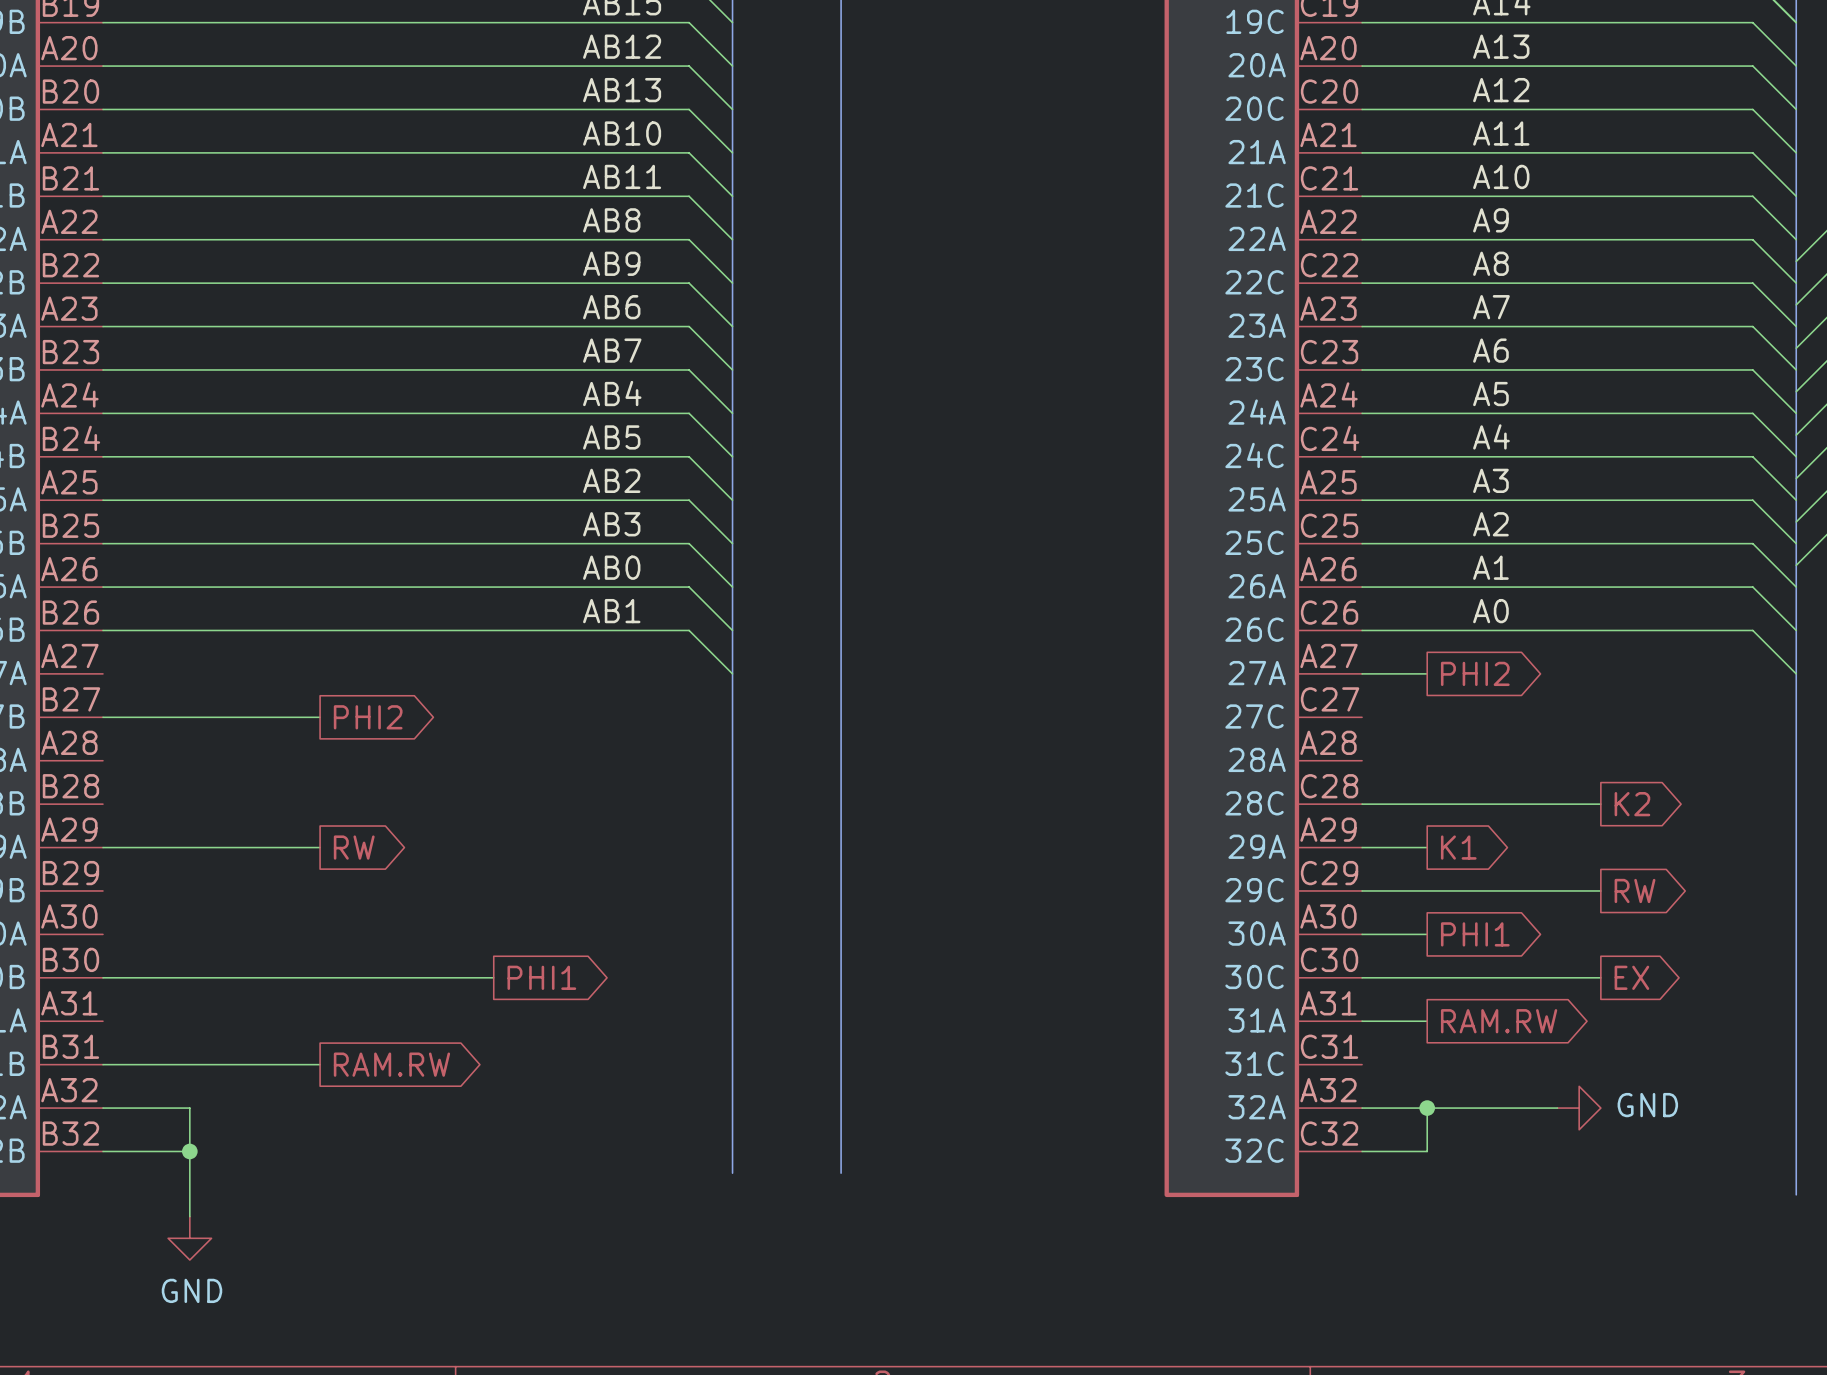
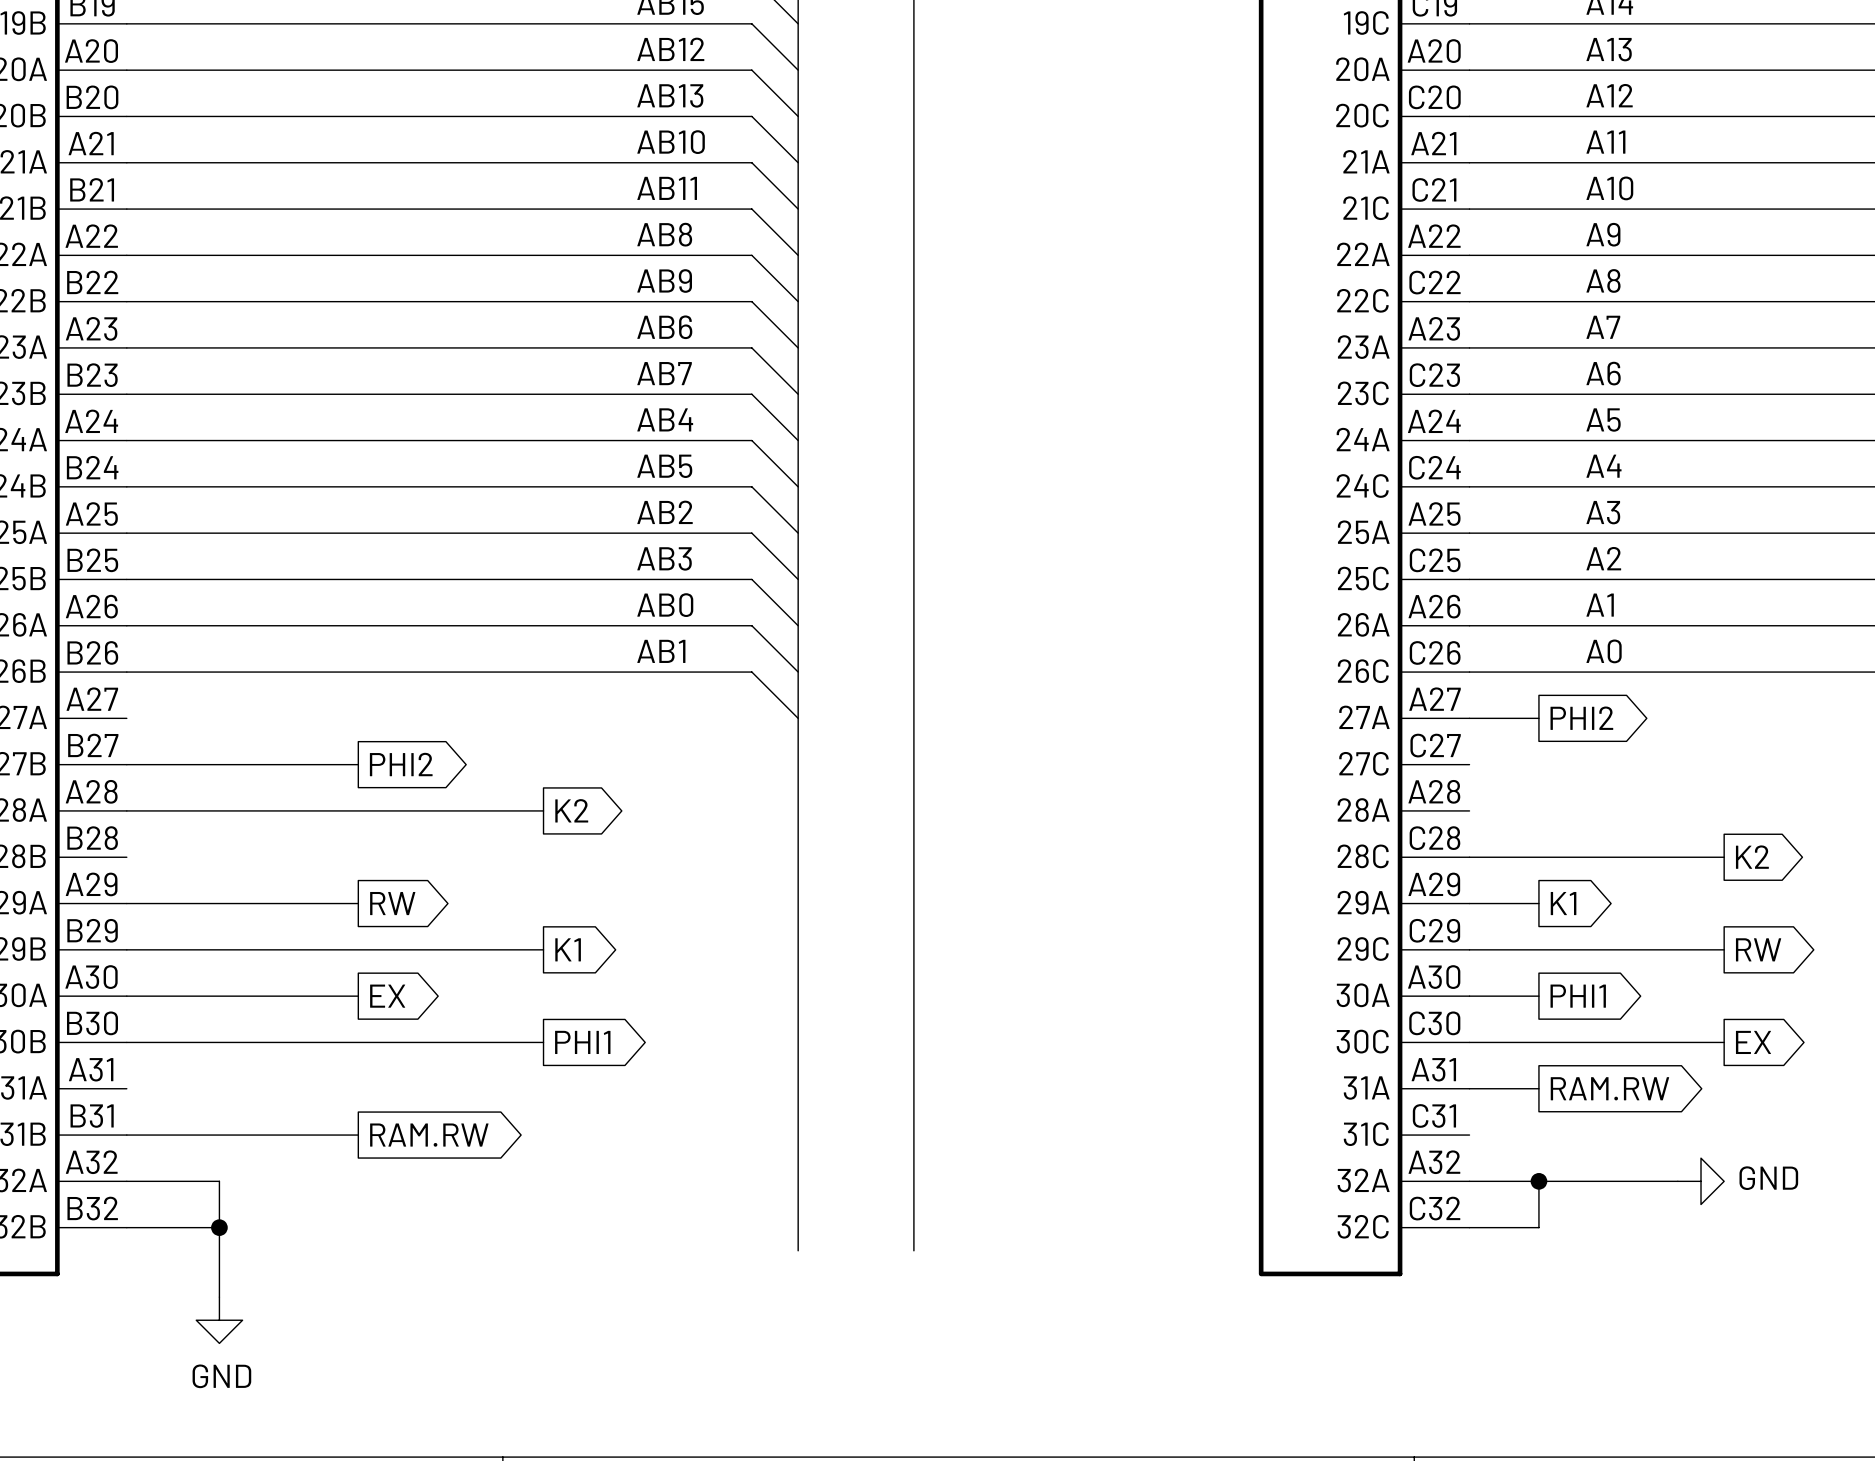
wire: none -> (126, 810) (543, 810)
global label: none -> K2 (571, 810)
wire: none -> (126, 949) (543, 949)
global label: none -> K1 (568, 949)
wire: none -> (126, 996) (358, 996)
global label: none -> EX (387, 996)

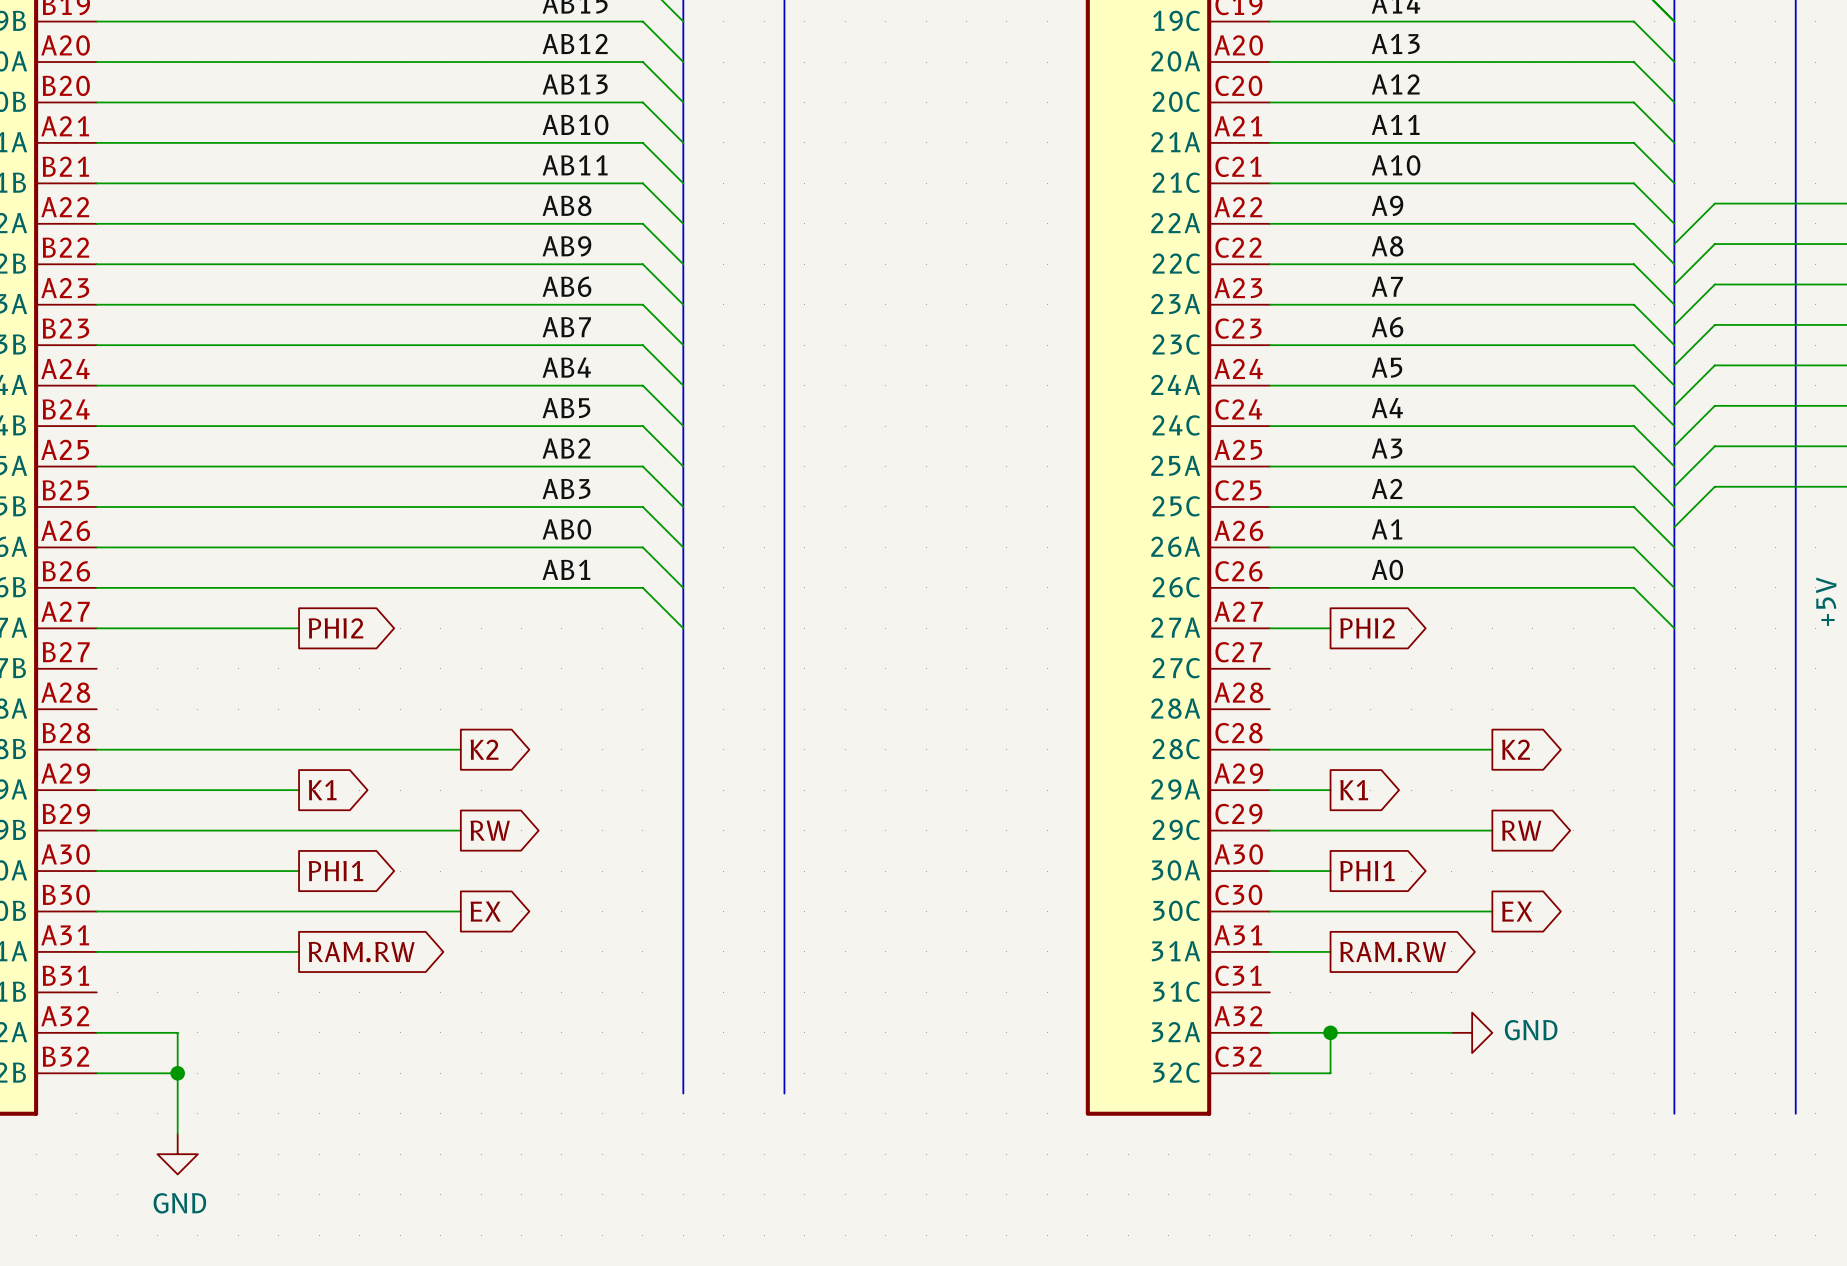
wire: (126, 764) (358, 764) -> (96, 628) (299, 628)
global label position: PHI2 (401, 764) -> PHI2 (335, 628)
wire: (126, 810) (543, 810) -> (96, 749) (460, 749)
global label position: K2 (571, 810) -> K2 (484, 749)
global label: RW (392, 903) -> K1 (322, 790)
global label: K1 (568, 949) -> RW (490, 830)
global label: EX (387, 996) -> PHI1 (335, 871)
global label: PHI1 (582, 1042) -> EX (485, 911)
wire: (126, 1135) (358, 1135) -> (96, 951) (299, 951)
global label position: RAM.RW (429, 1135) -> RAM.RW (361, 952)

